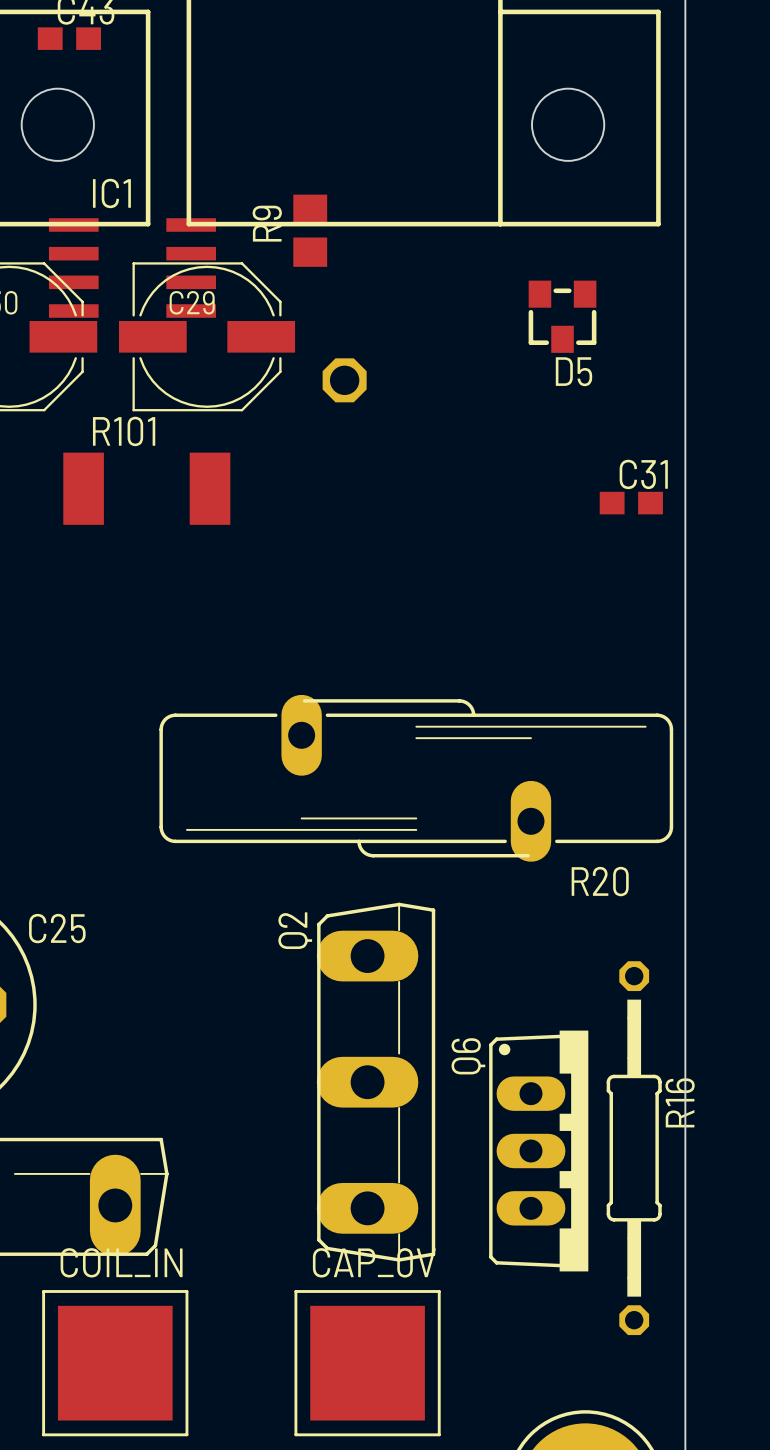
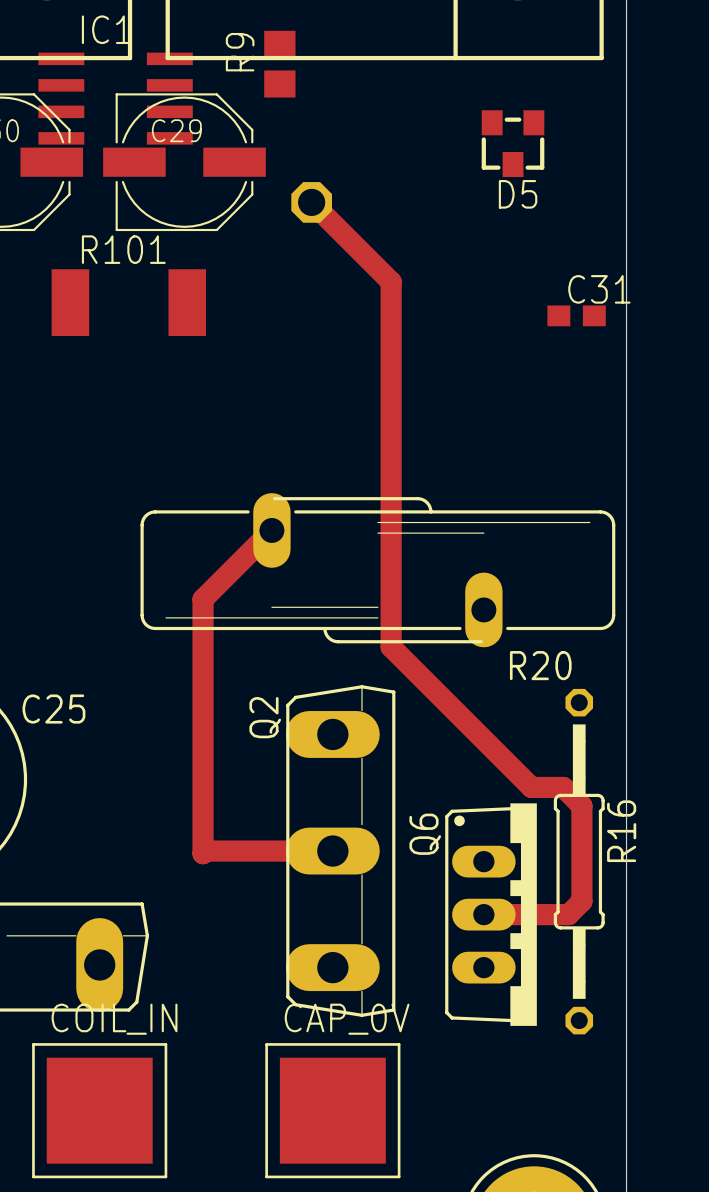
track: none -> (311, 202) (391, 281) (391, 647) (531, 787) (563, 787) (581, 806) (581, 901) (568, 914) (483, 914)
track: none -> (271, 530) (203, 599) (203, 853) (205, 851) (332, 851)
R16 position: (634, 1148) -> (579, 861)

